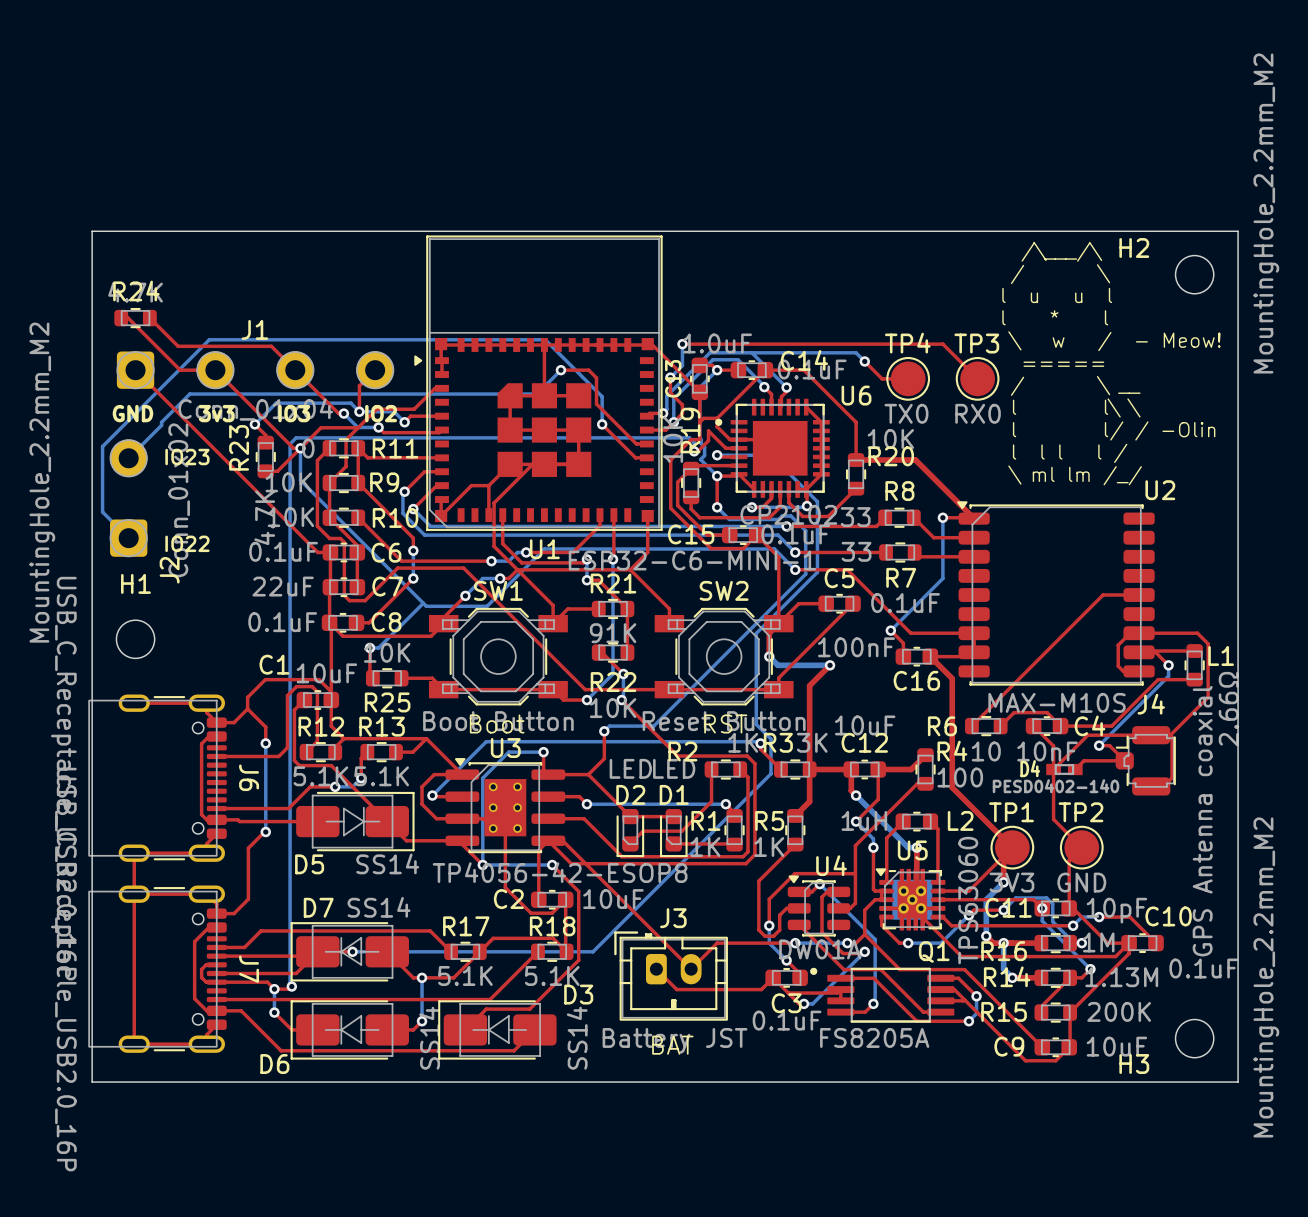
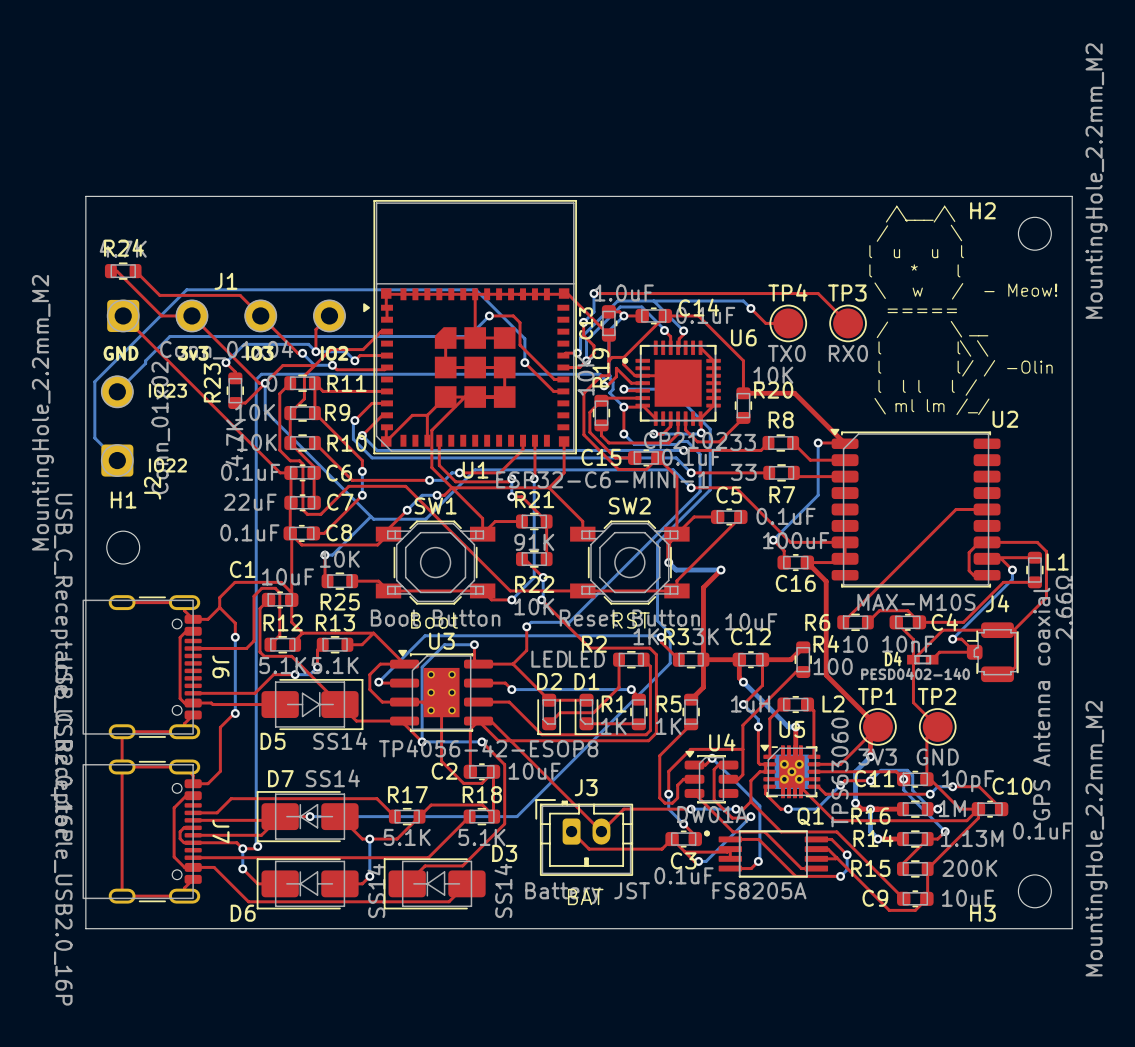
C16 value: 100nF (856, 647) -> 100uF (796, 540)

